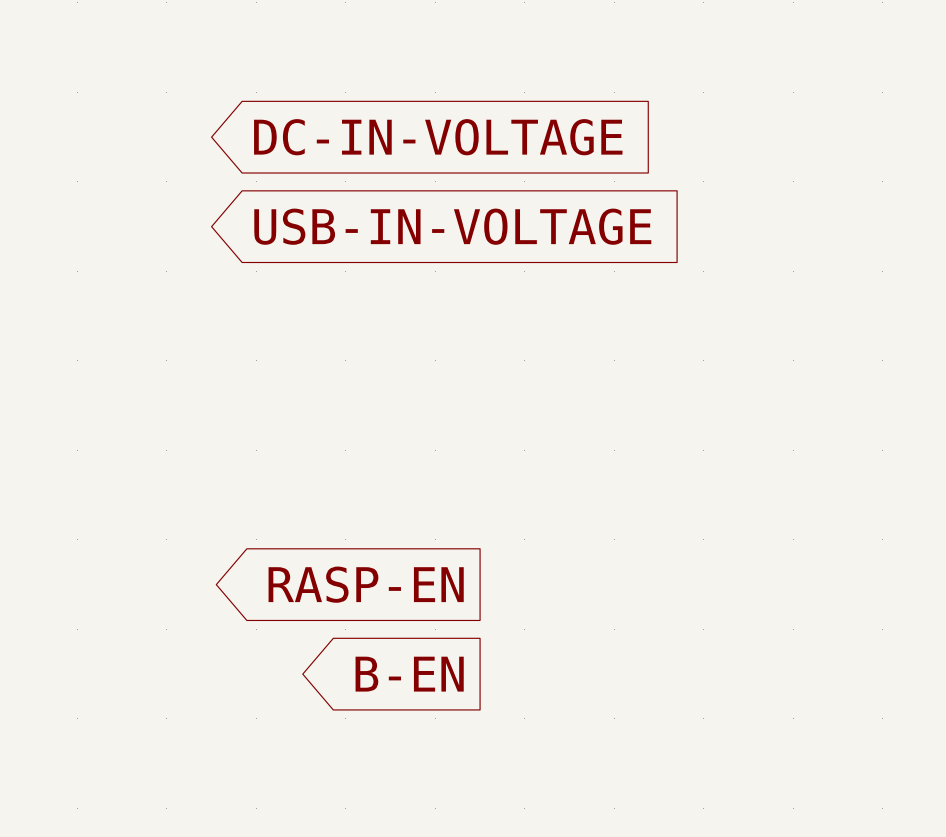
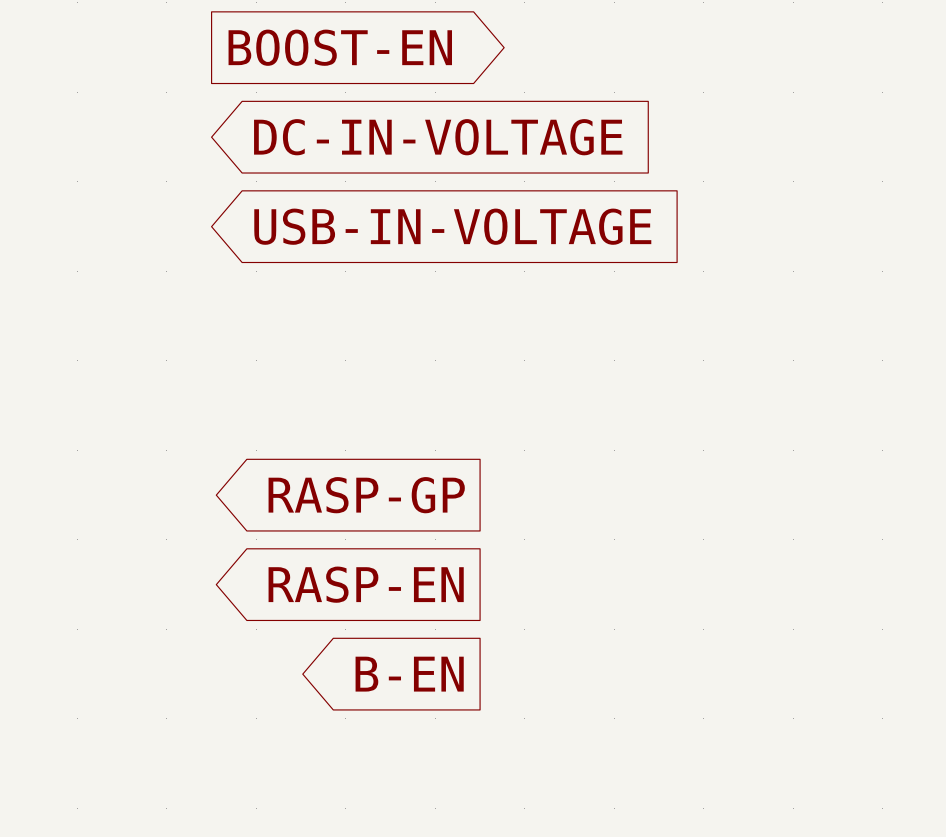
global label: none -> BOOST-EN (340, 47)
global label: none -> RASP-GP (366, 495)

